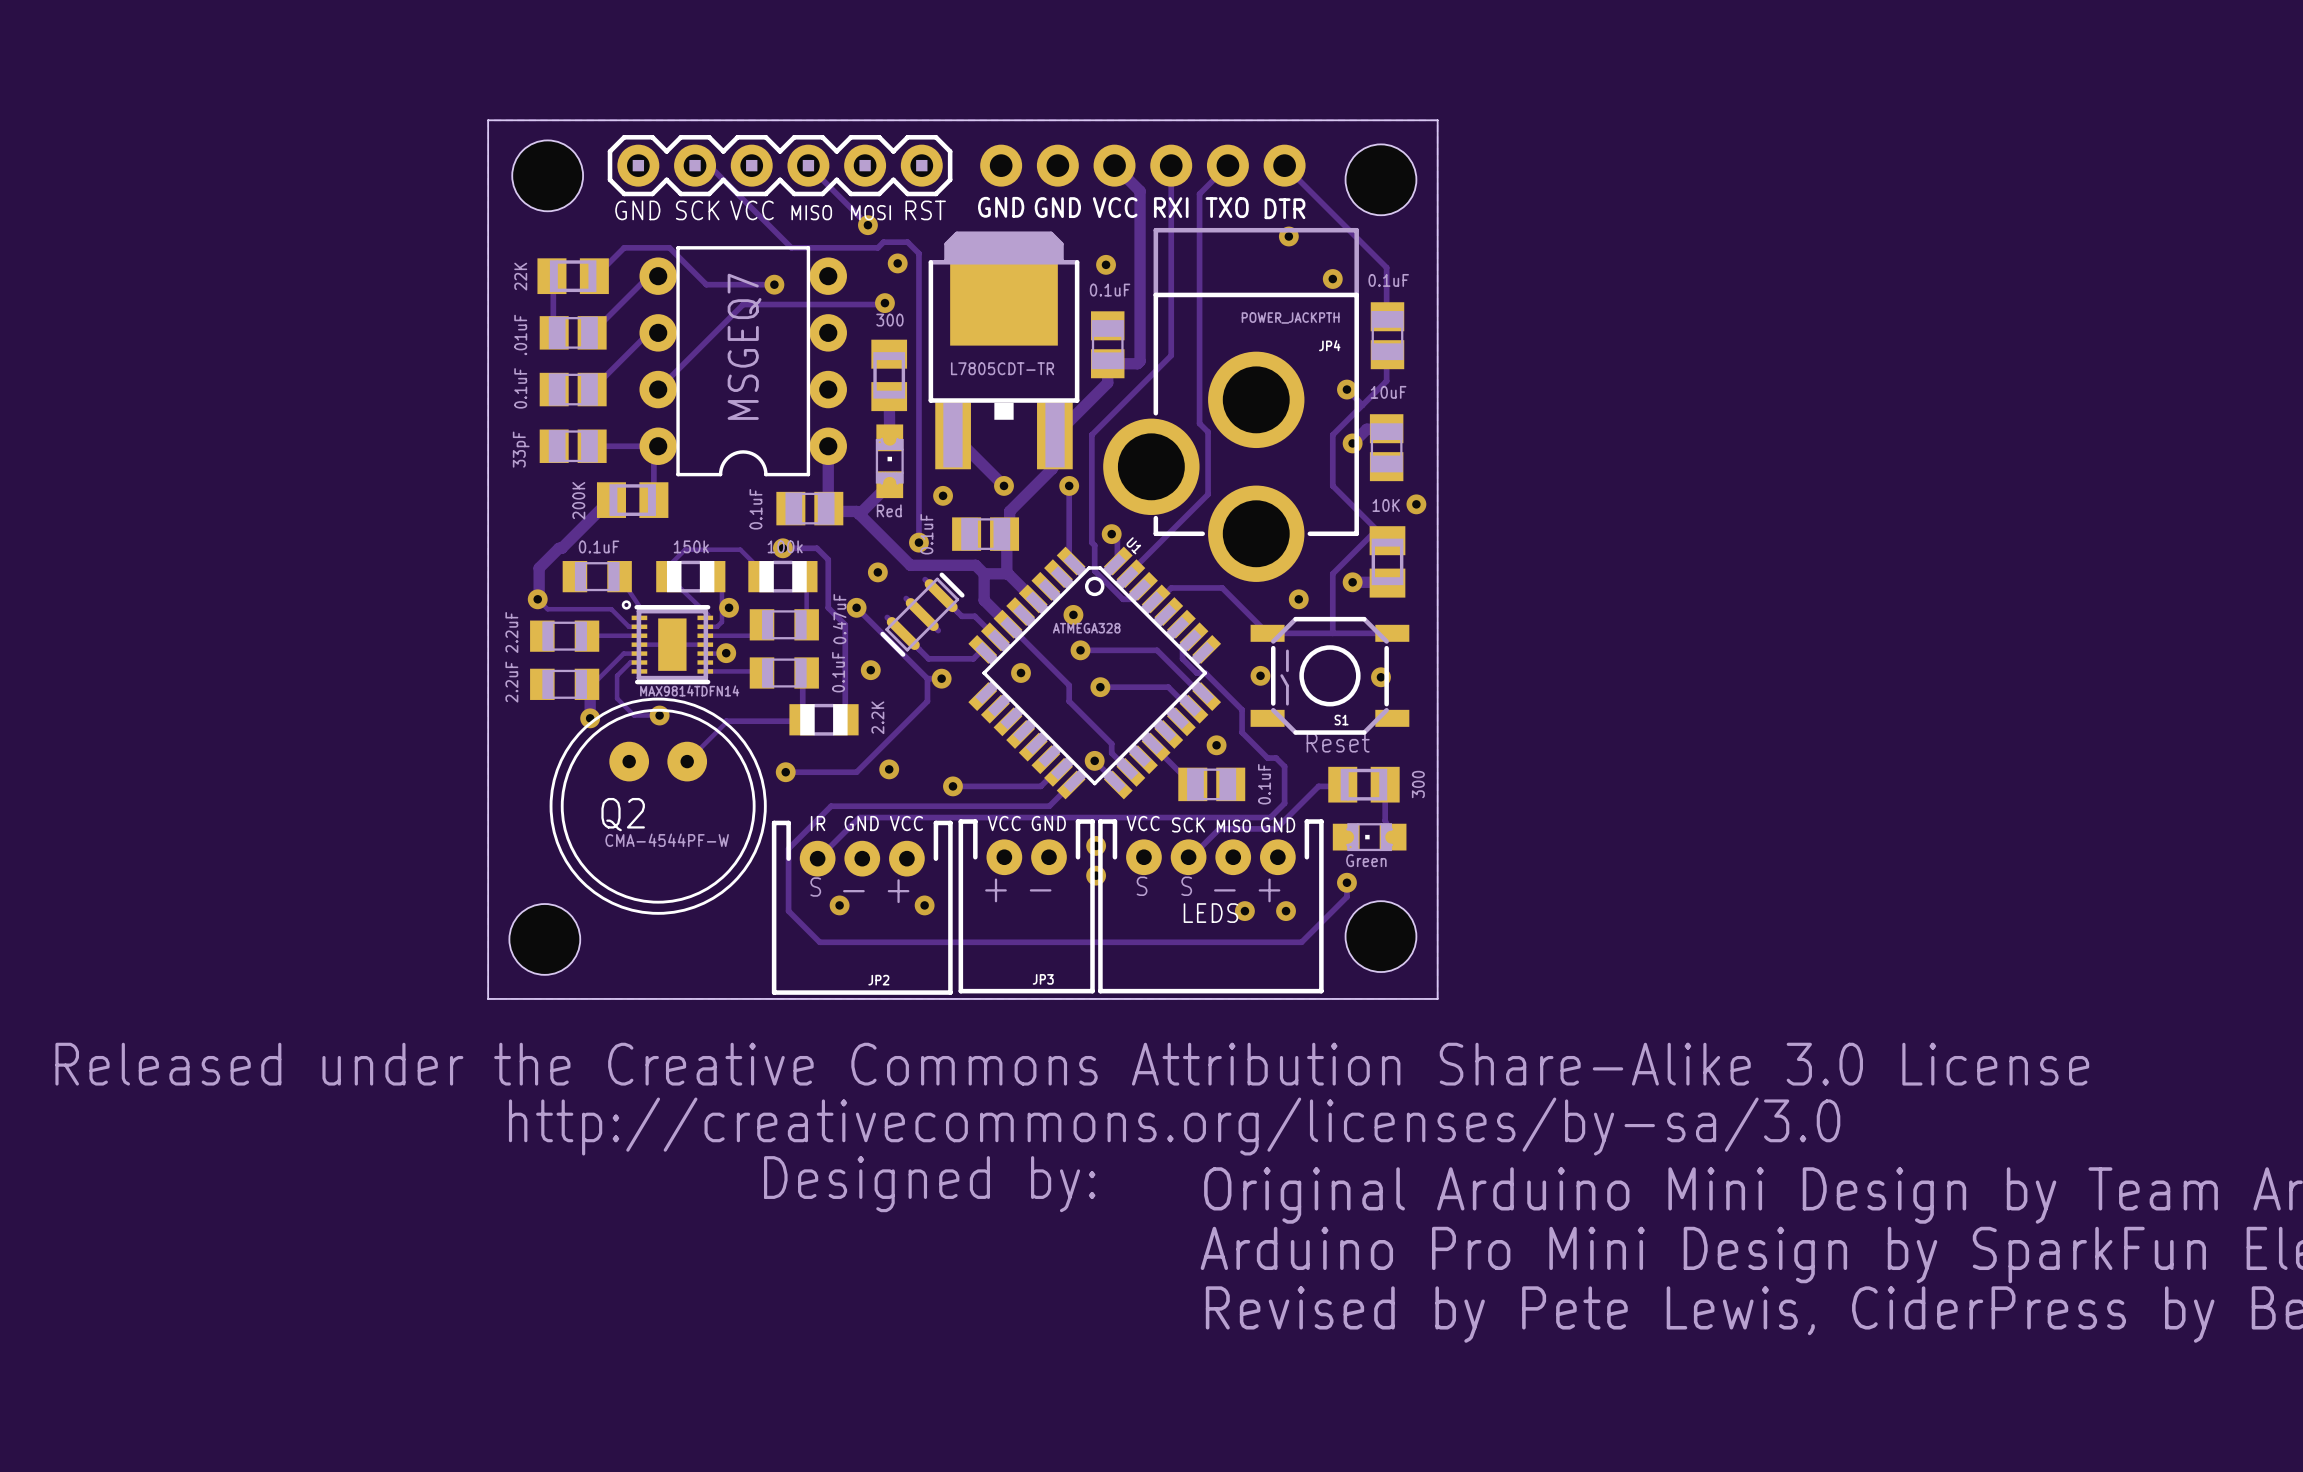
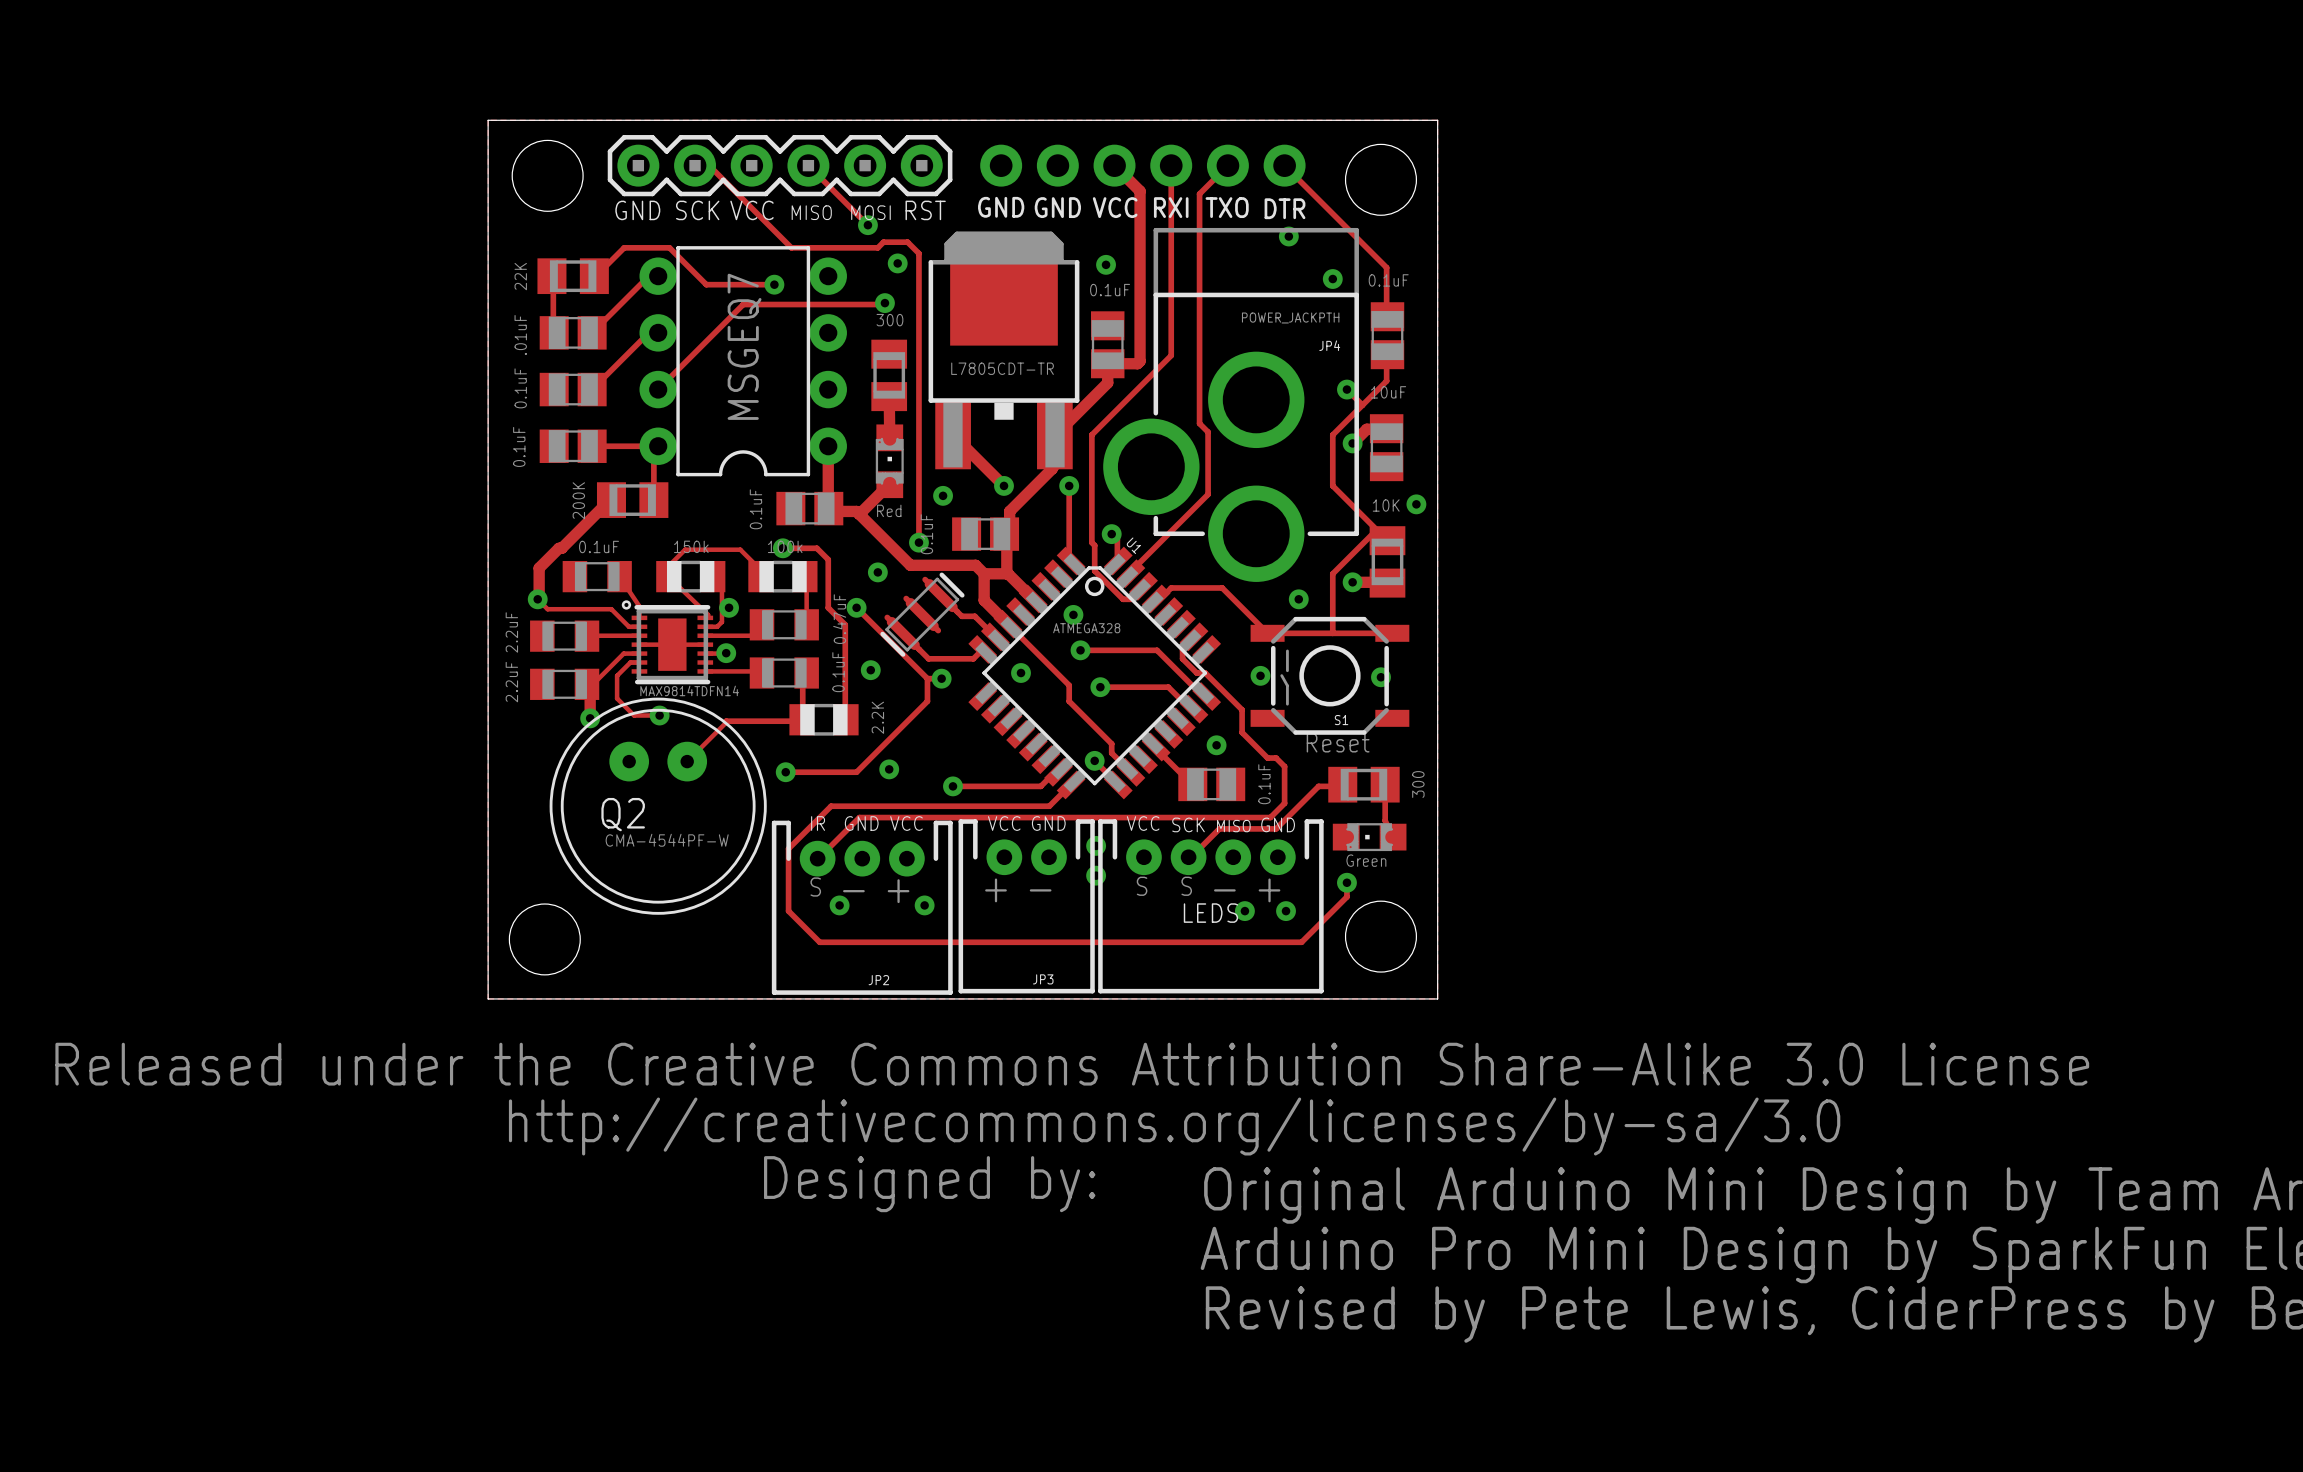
part value: 33pF (521, 449) -> 0.1uF (519, 446)

